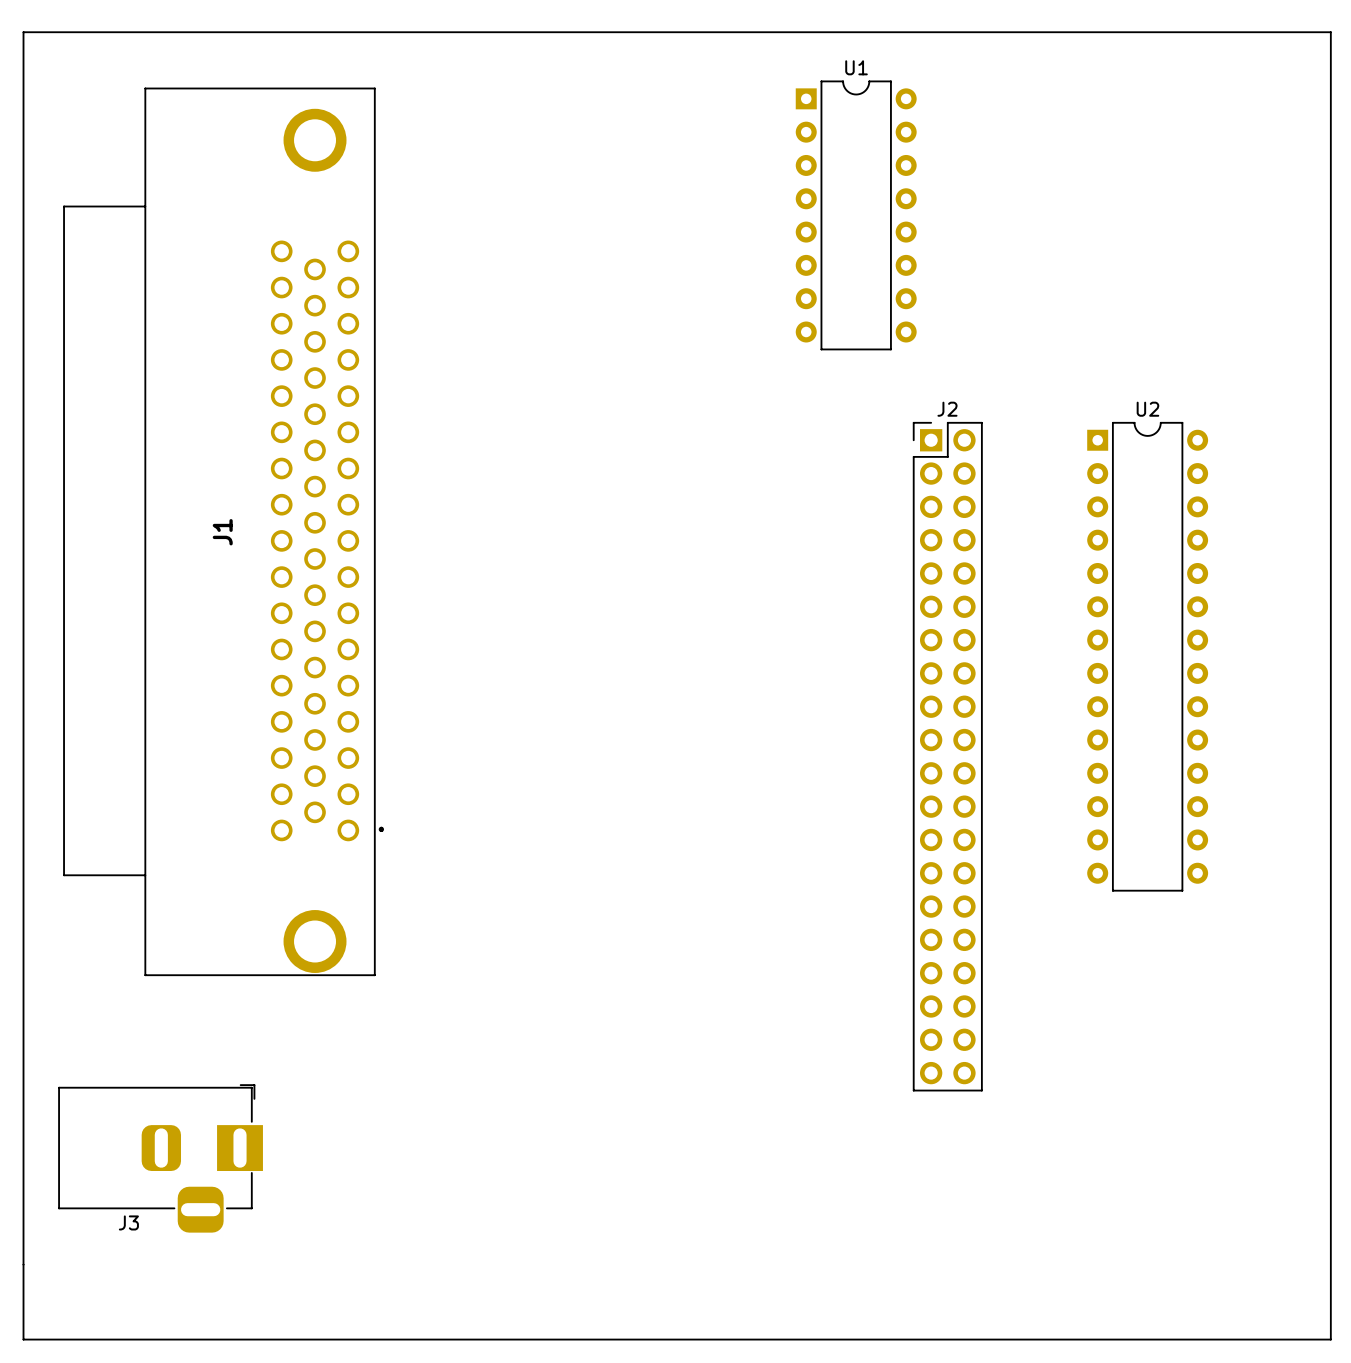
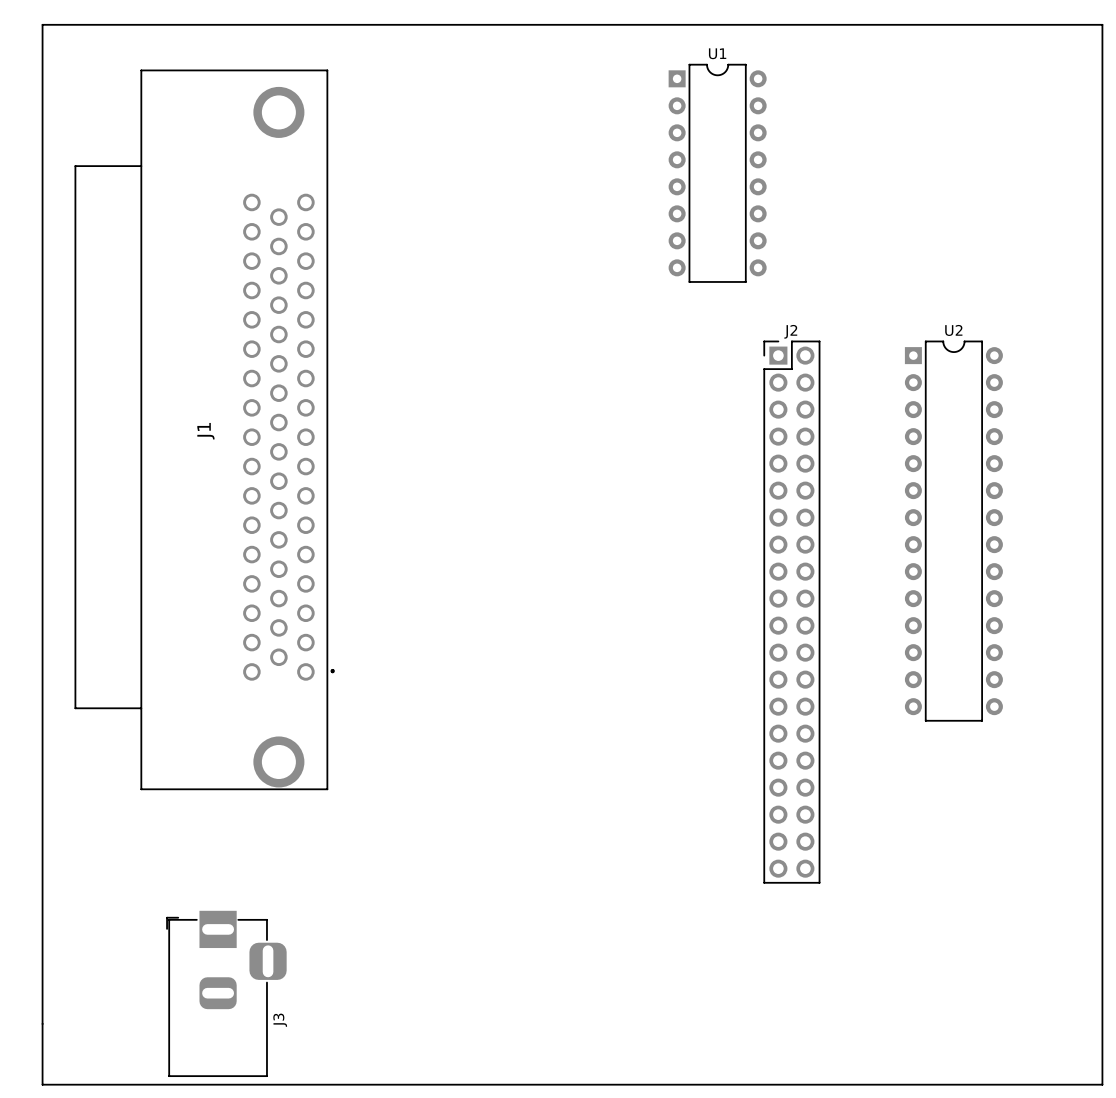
J3 rotation: 0° (160, 1158) -> 90° counterclockwise (226, 993)

